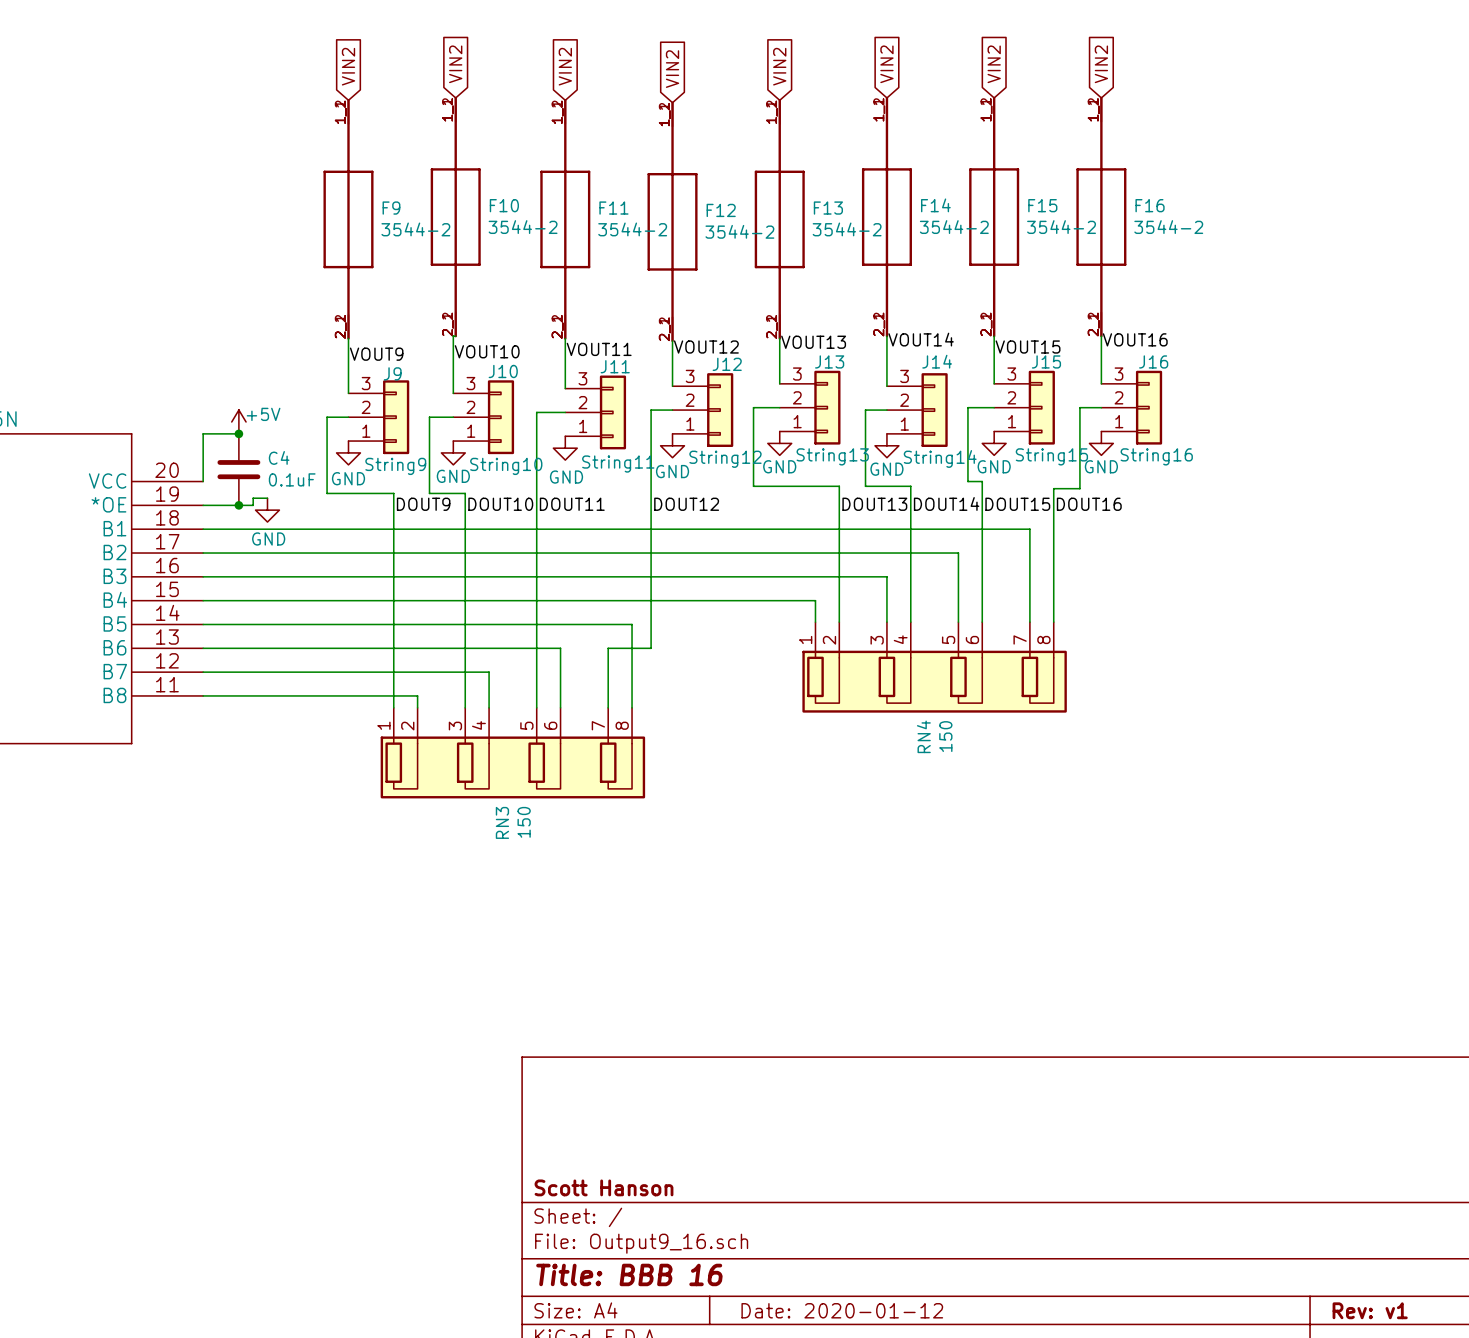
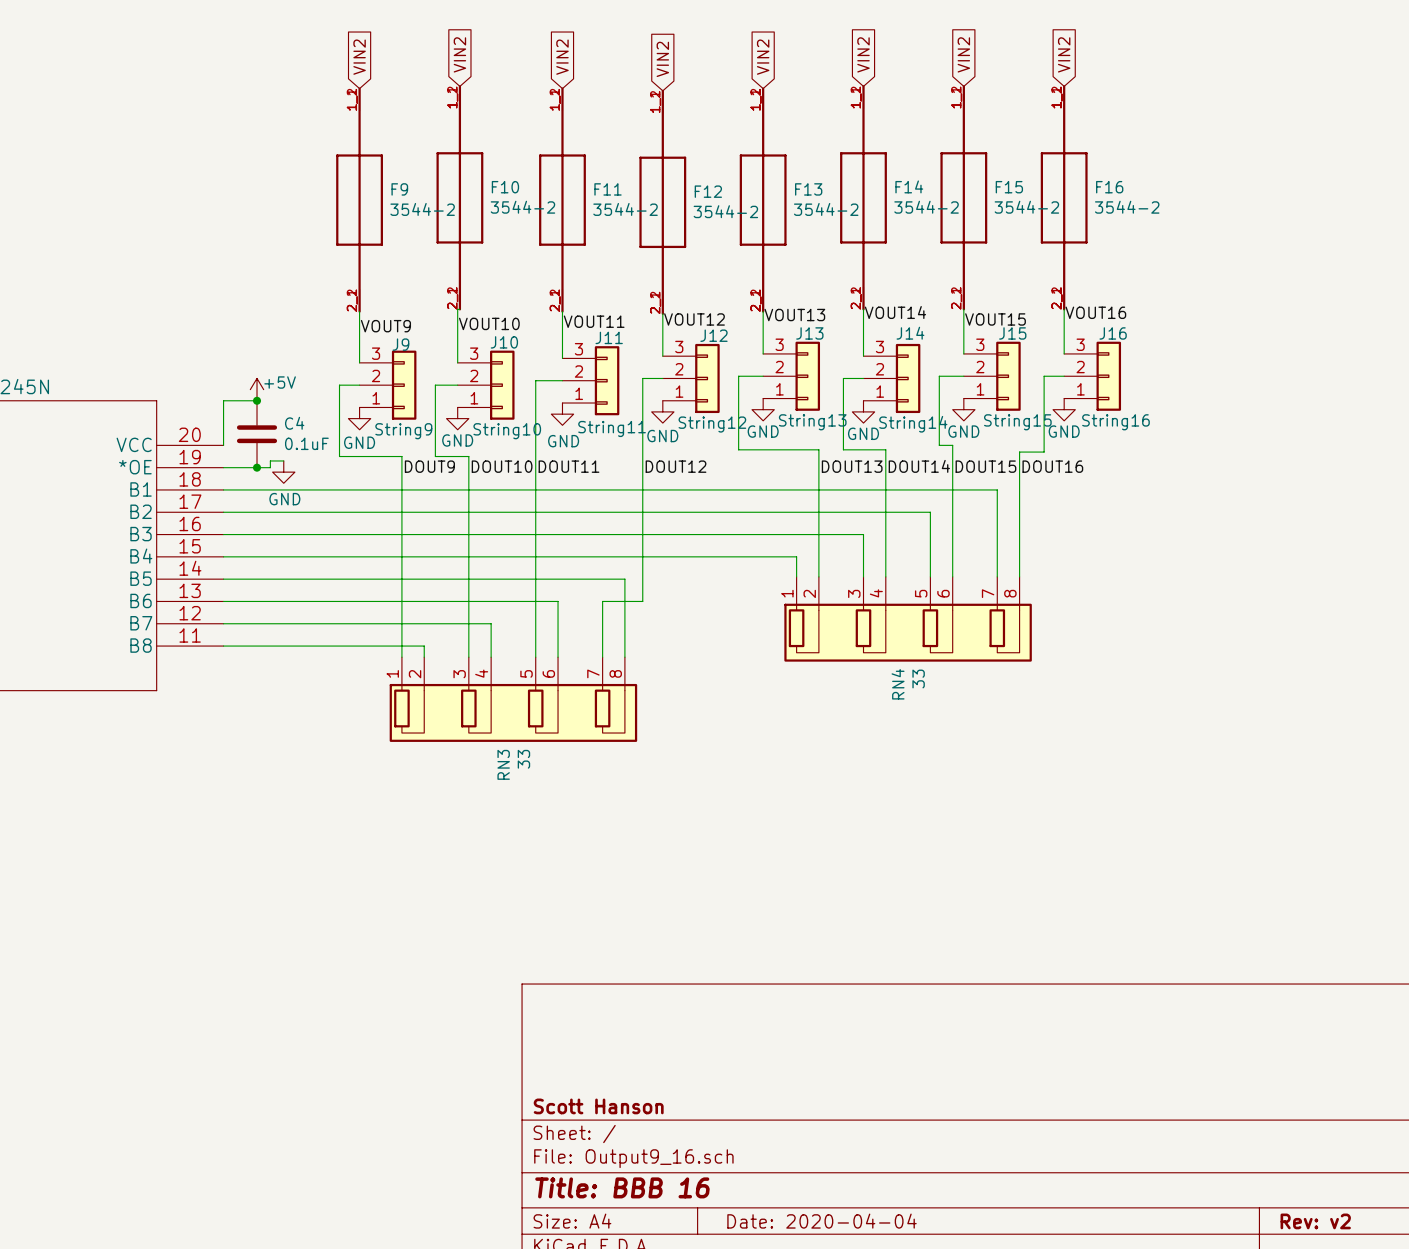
RN4 value: 150 (945, 736) -> 33 (918, 678)
RN3 value: 150 (524, 822) -> 33 (523, 759)
title block: Date: 2020-01-12 (842, 1310) -> Date: 2020-04-04 (822, 1221)
title block: Rev: v1 (1370, 1310) -> Rev: v2 (1315, 1221)

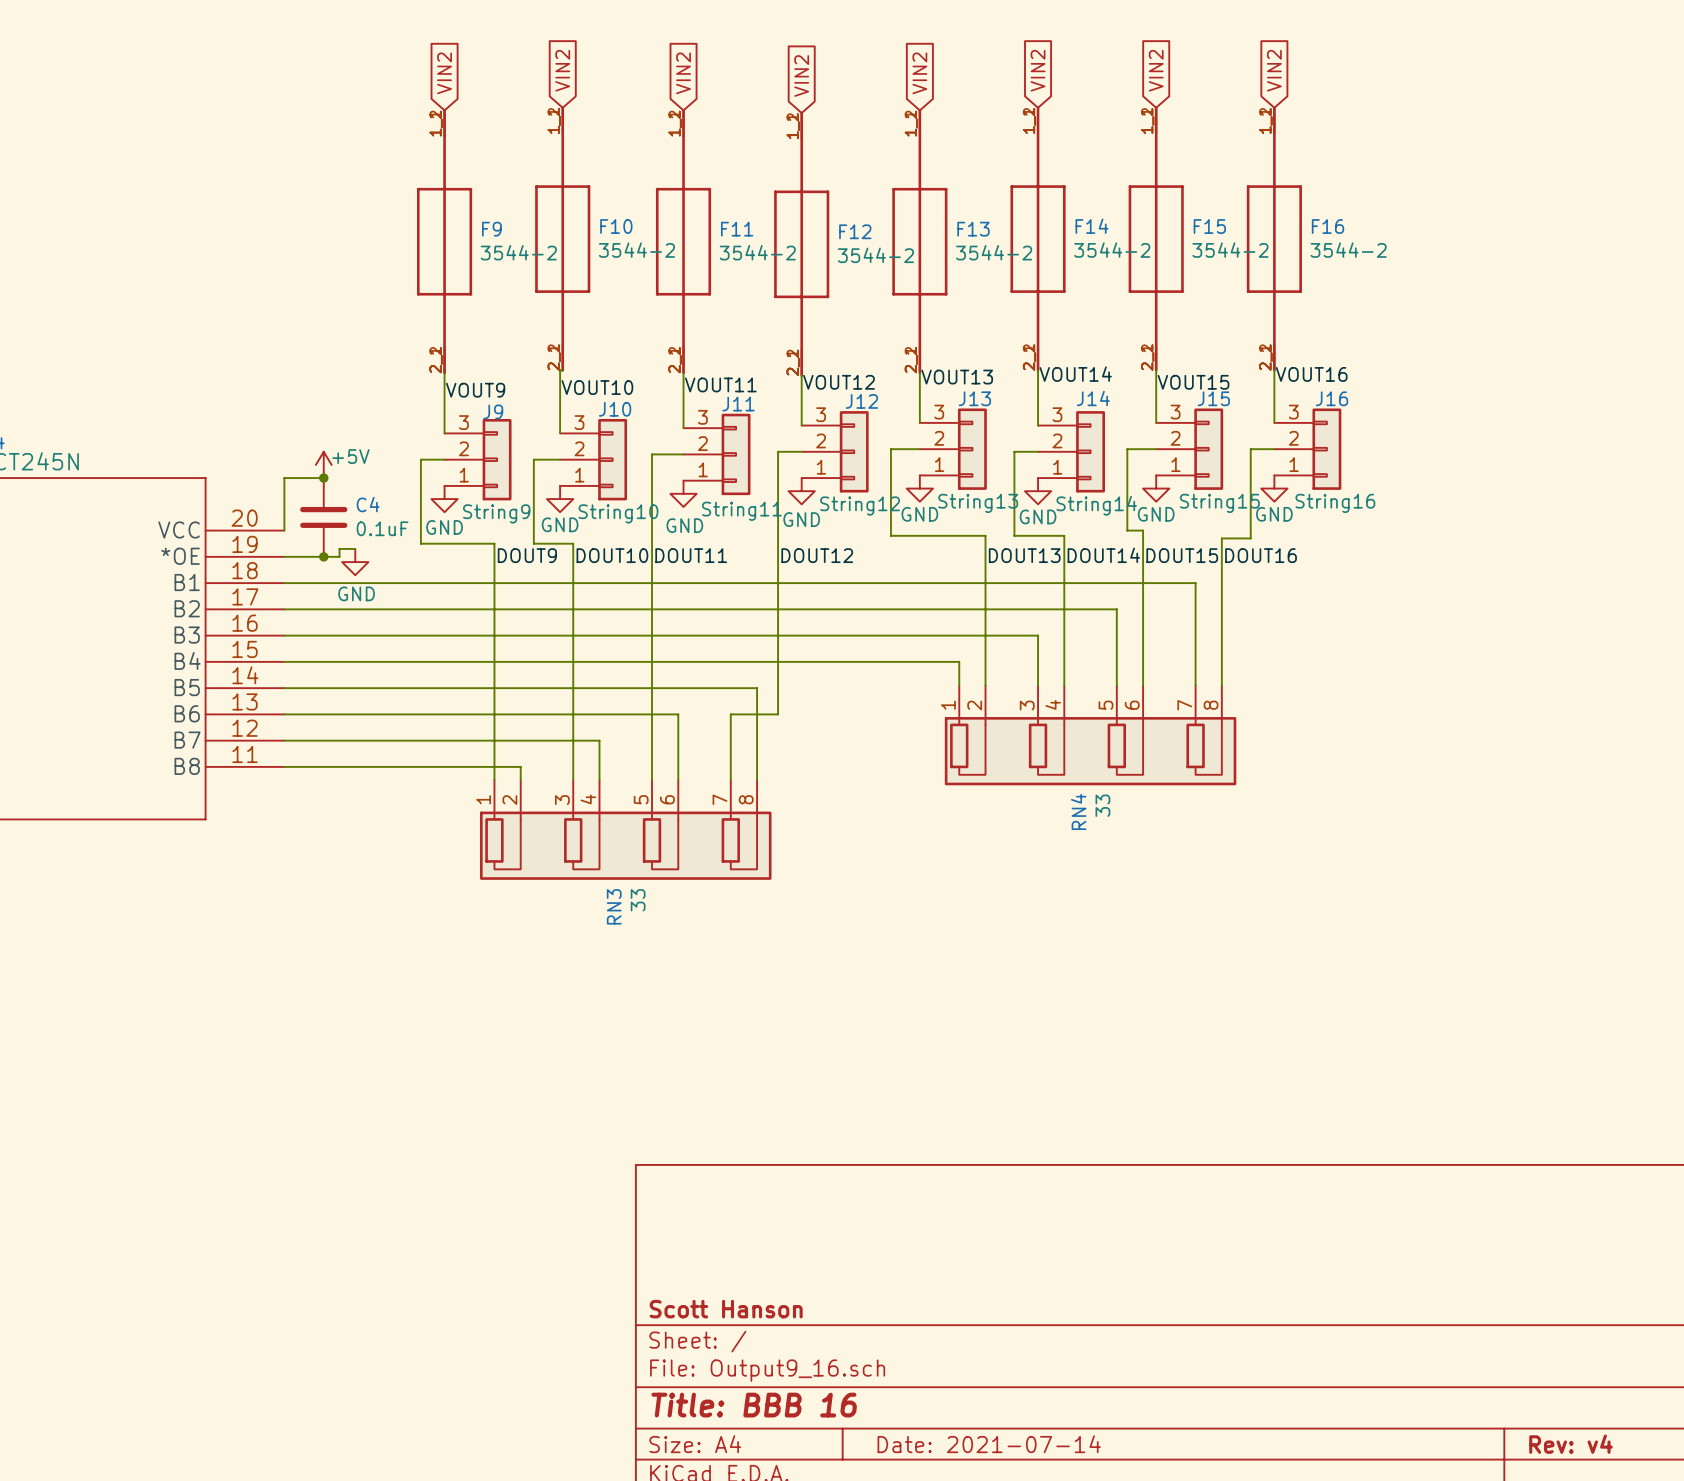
title block: Date: 2020-04-04 (822, 1221) -> Date: 2021-07-14 (989, 1444)
title block: Rev: v2 (1315, 1221) -> Rev: v4 (1570, 1444)

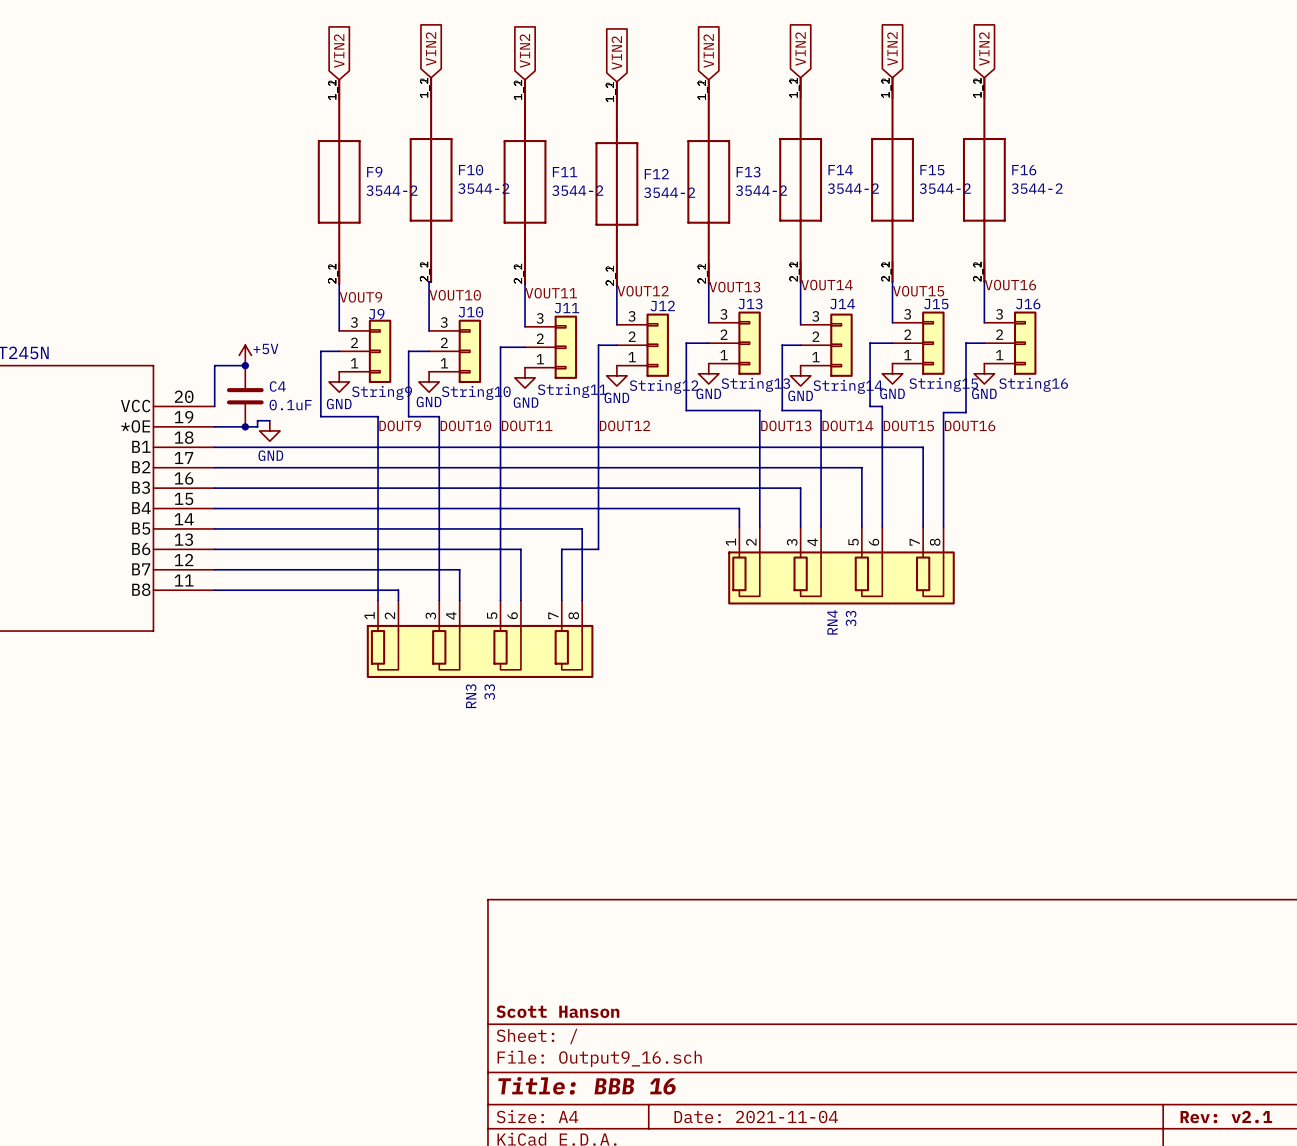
title block: Date: 2021-07-14 (989, 1444) -> Date: 2021-11-04 (756, 1117)
title block: Rev: v4 (1570, 1444) -> Rev: v2.1 (1226, 1117)

